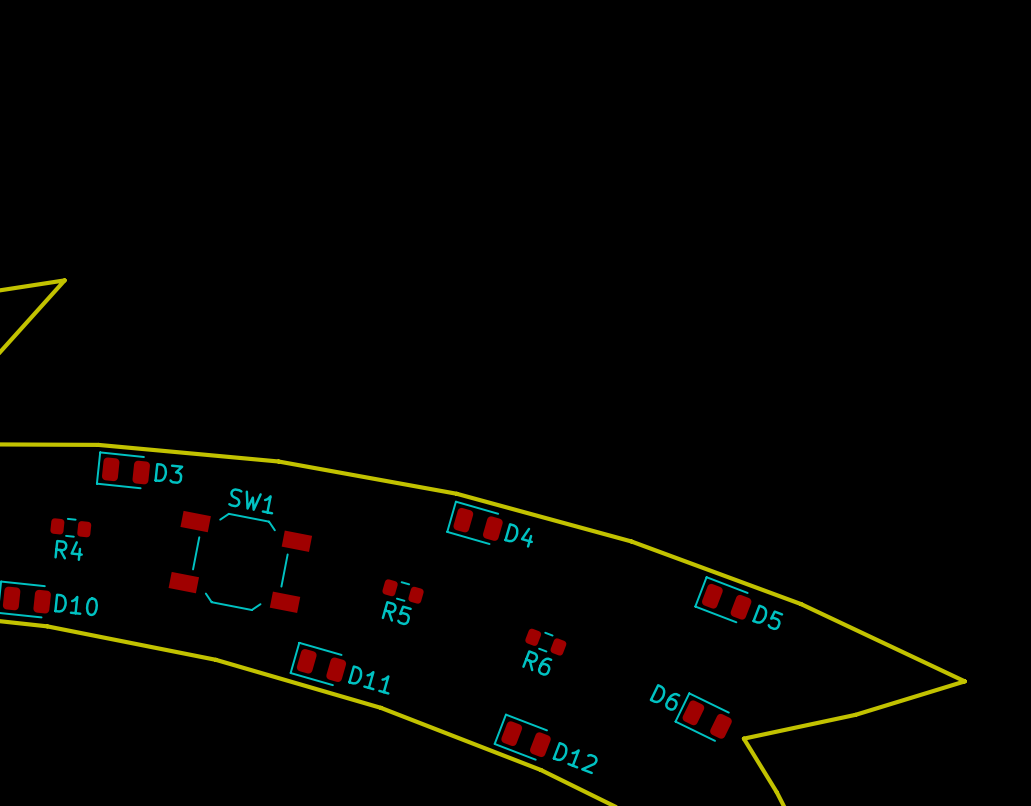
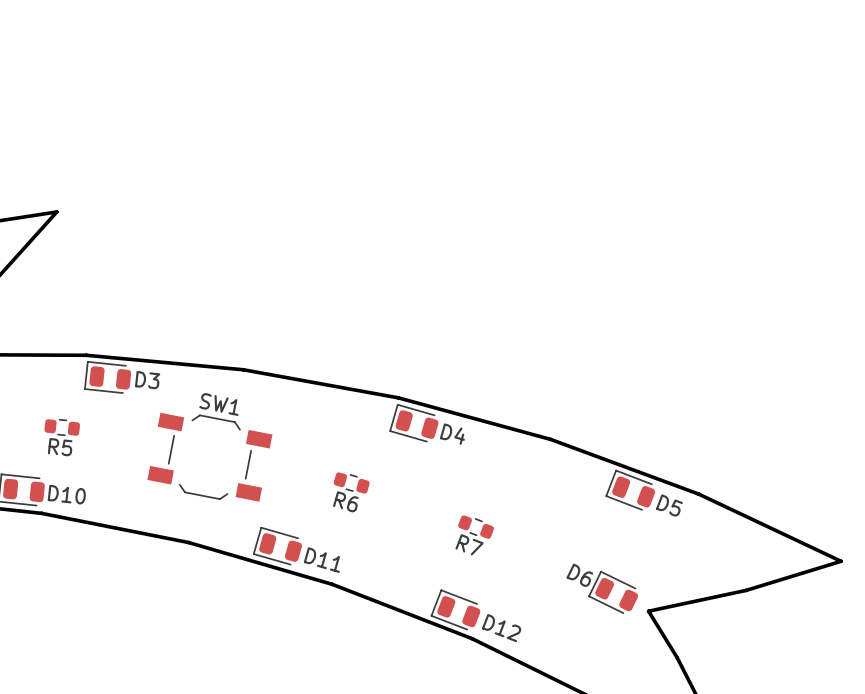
R4 name: R4 (68, 550) -> R5 (60, 447)
R5 name: R5 (396, 613) -> R6 (345, 501)
R6 name: R6 (537, 662) -> R7 (469, 544)

